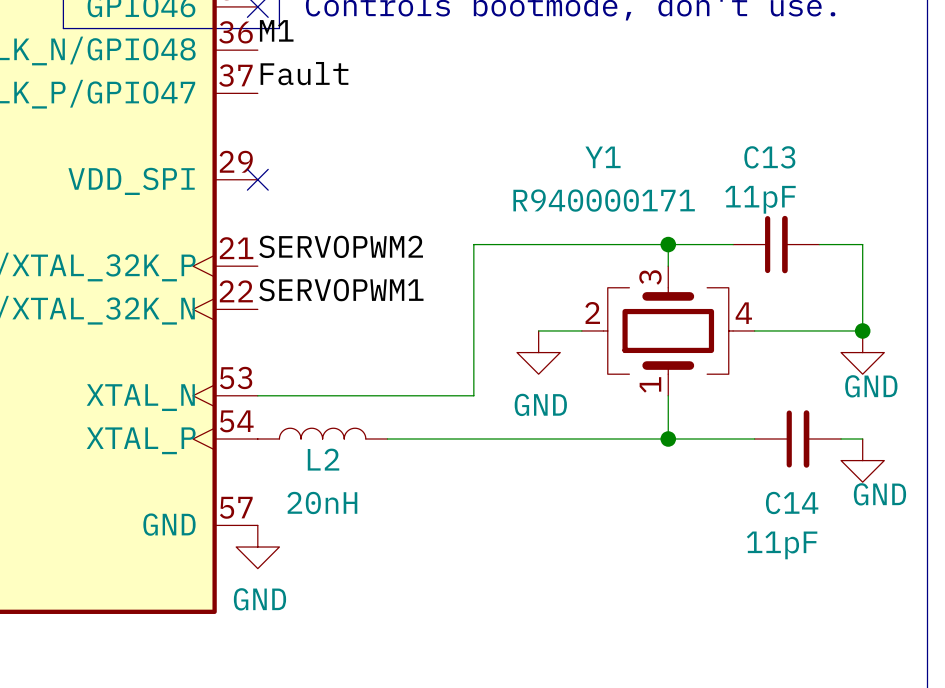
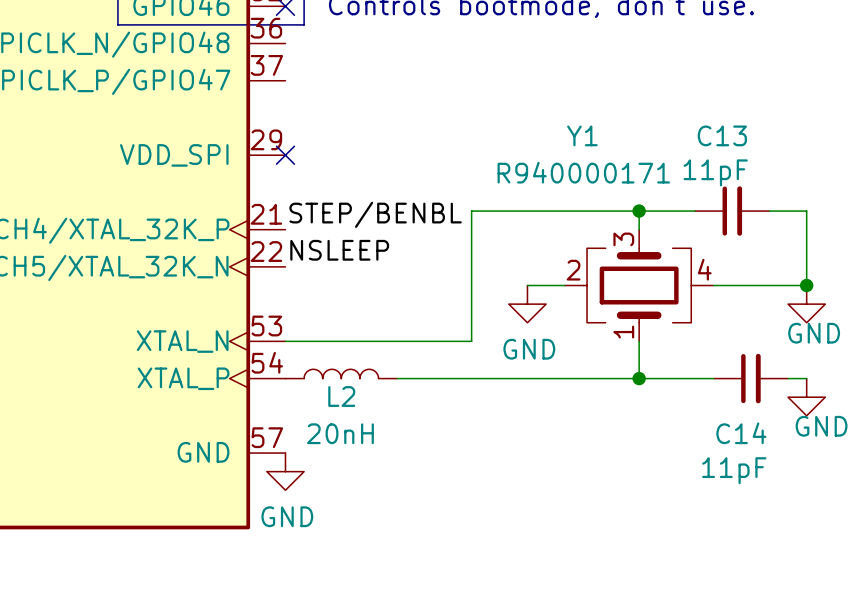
label: M1 (276, 30) -> none
label: Fault (304, 73) -> none
label: SERVOPWM2 (341, 246) -> STEP/BENBL (375, 214)
label: SERVOPWM1 (341, 290) -> NSLEEP (339, 250)

